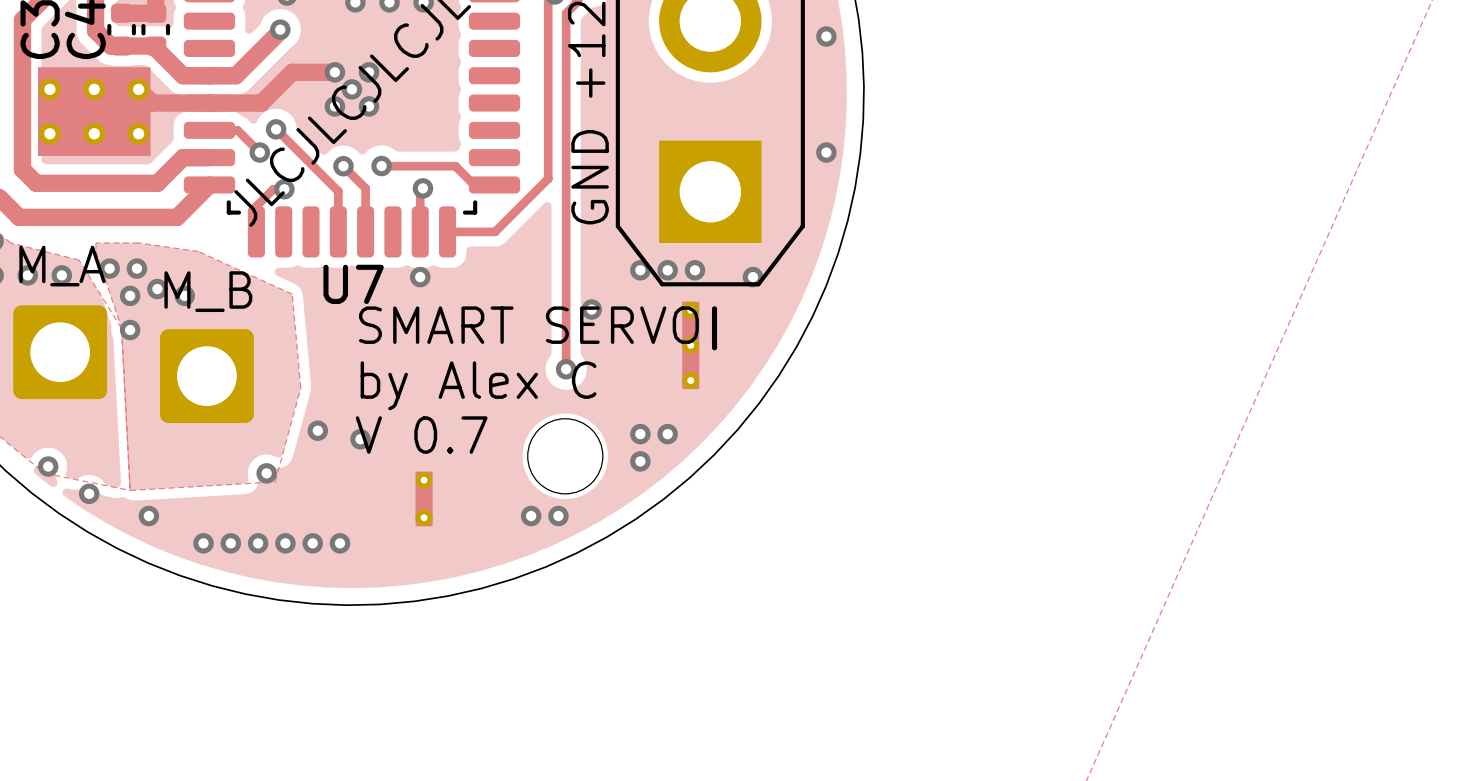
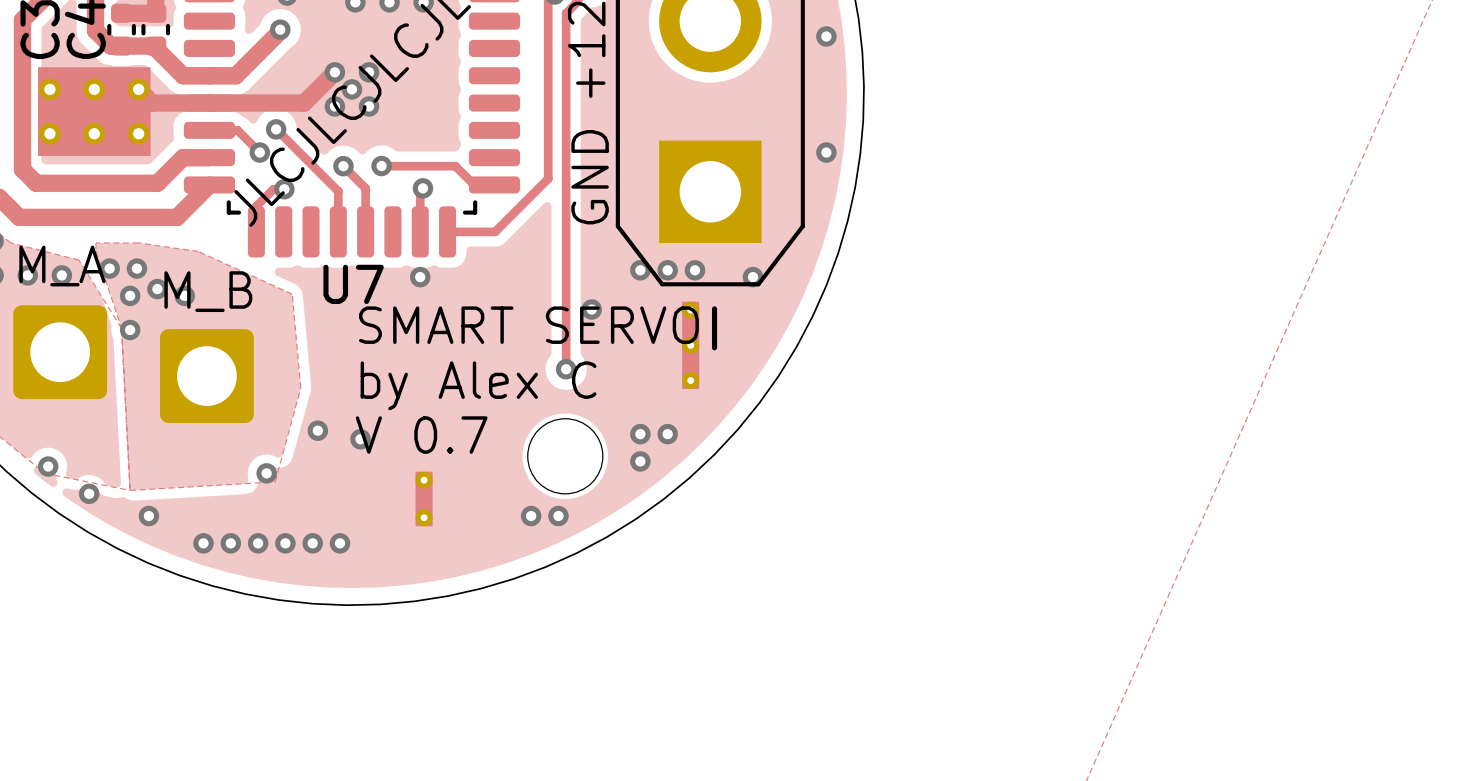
track: (334, 72) (292, 72) (261, 103) -> (334, 72) (304, 103) (261, 103)

